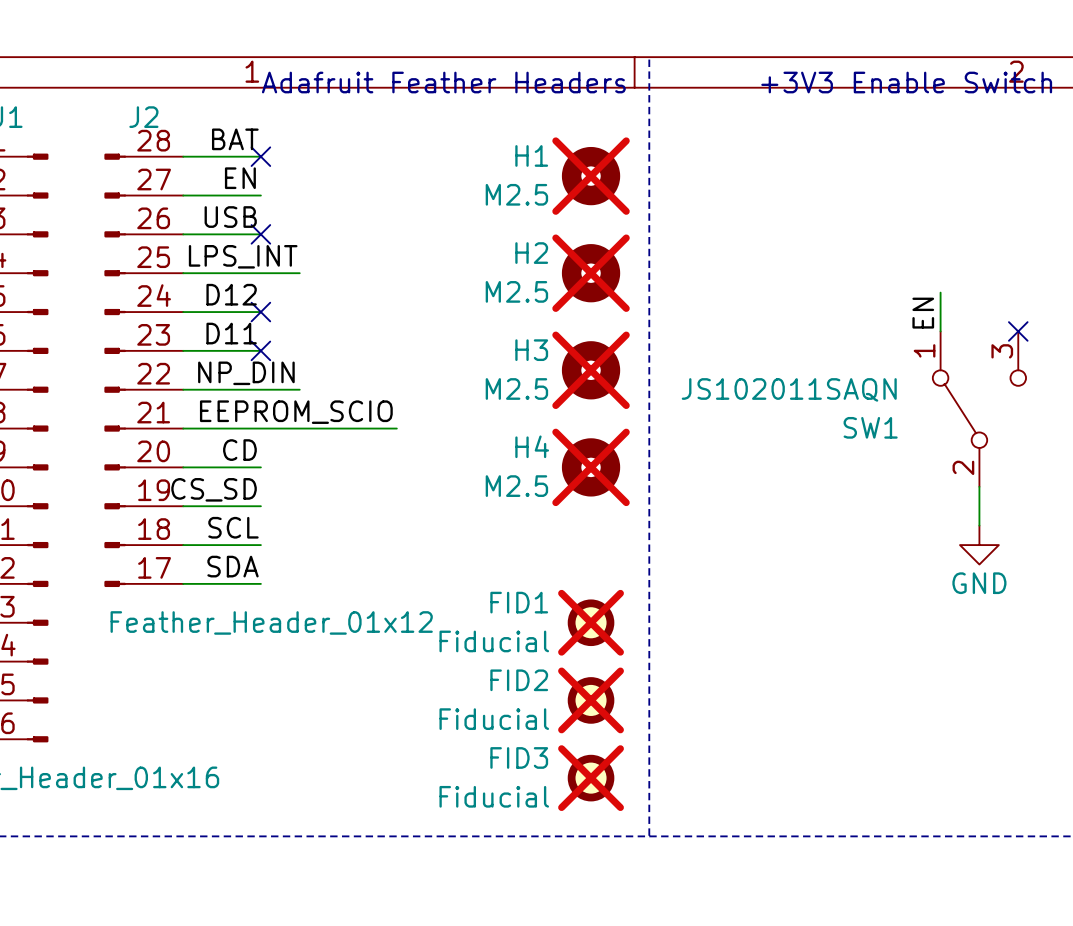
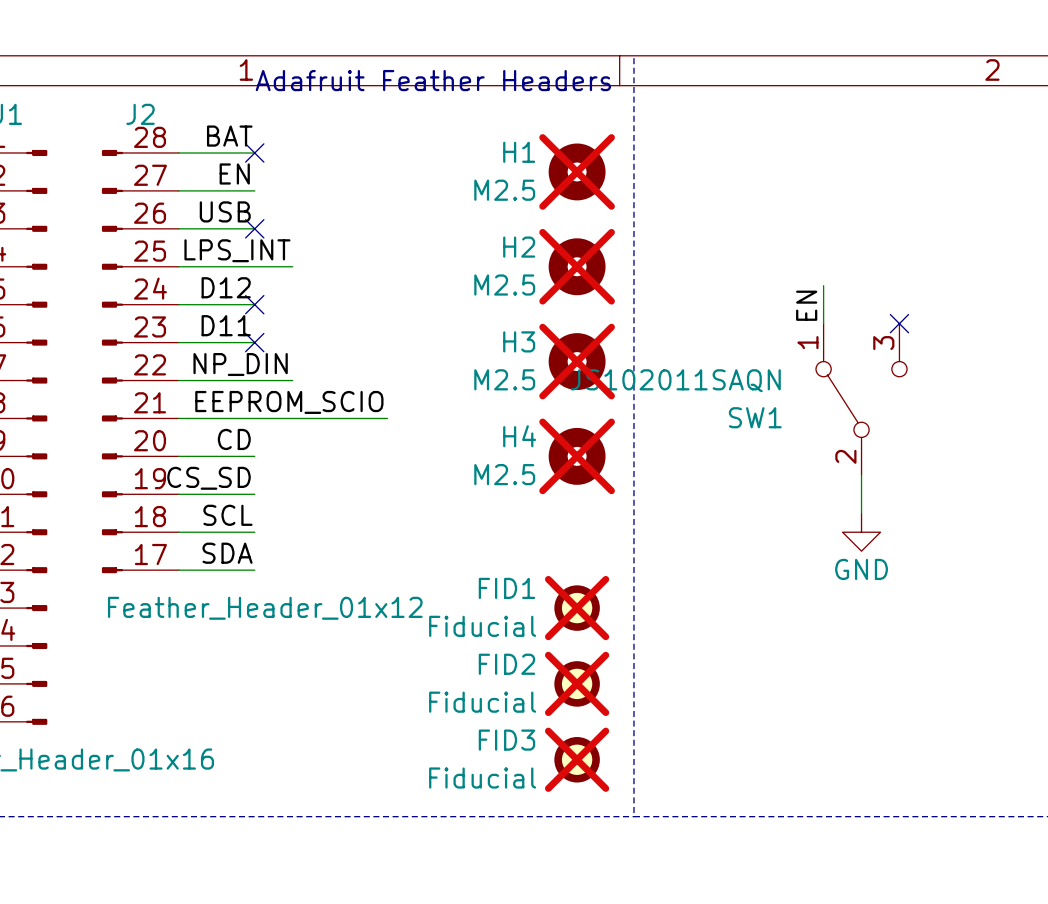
text: +3V3 Enable Switch (906, 82) -> none
wire: (940, 292) (940, 331) -> (823, 285) (823, 323)
label position: EN (923, 313) -> EN (806, 305)
no-connect mark: none -> (899, 323)
no-connect mark: (1018, 331) -> none
SW1 position: (979, 409) -> (861, 399)
wire: (979, 486) (979, 525) -> (861, 475) (861, 513)
power symbol position: GND (979, 545) -> GND (861, 532)

